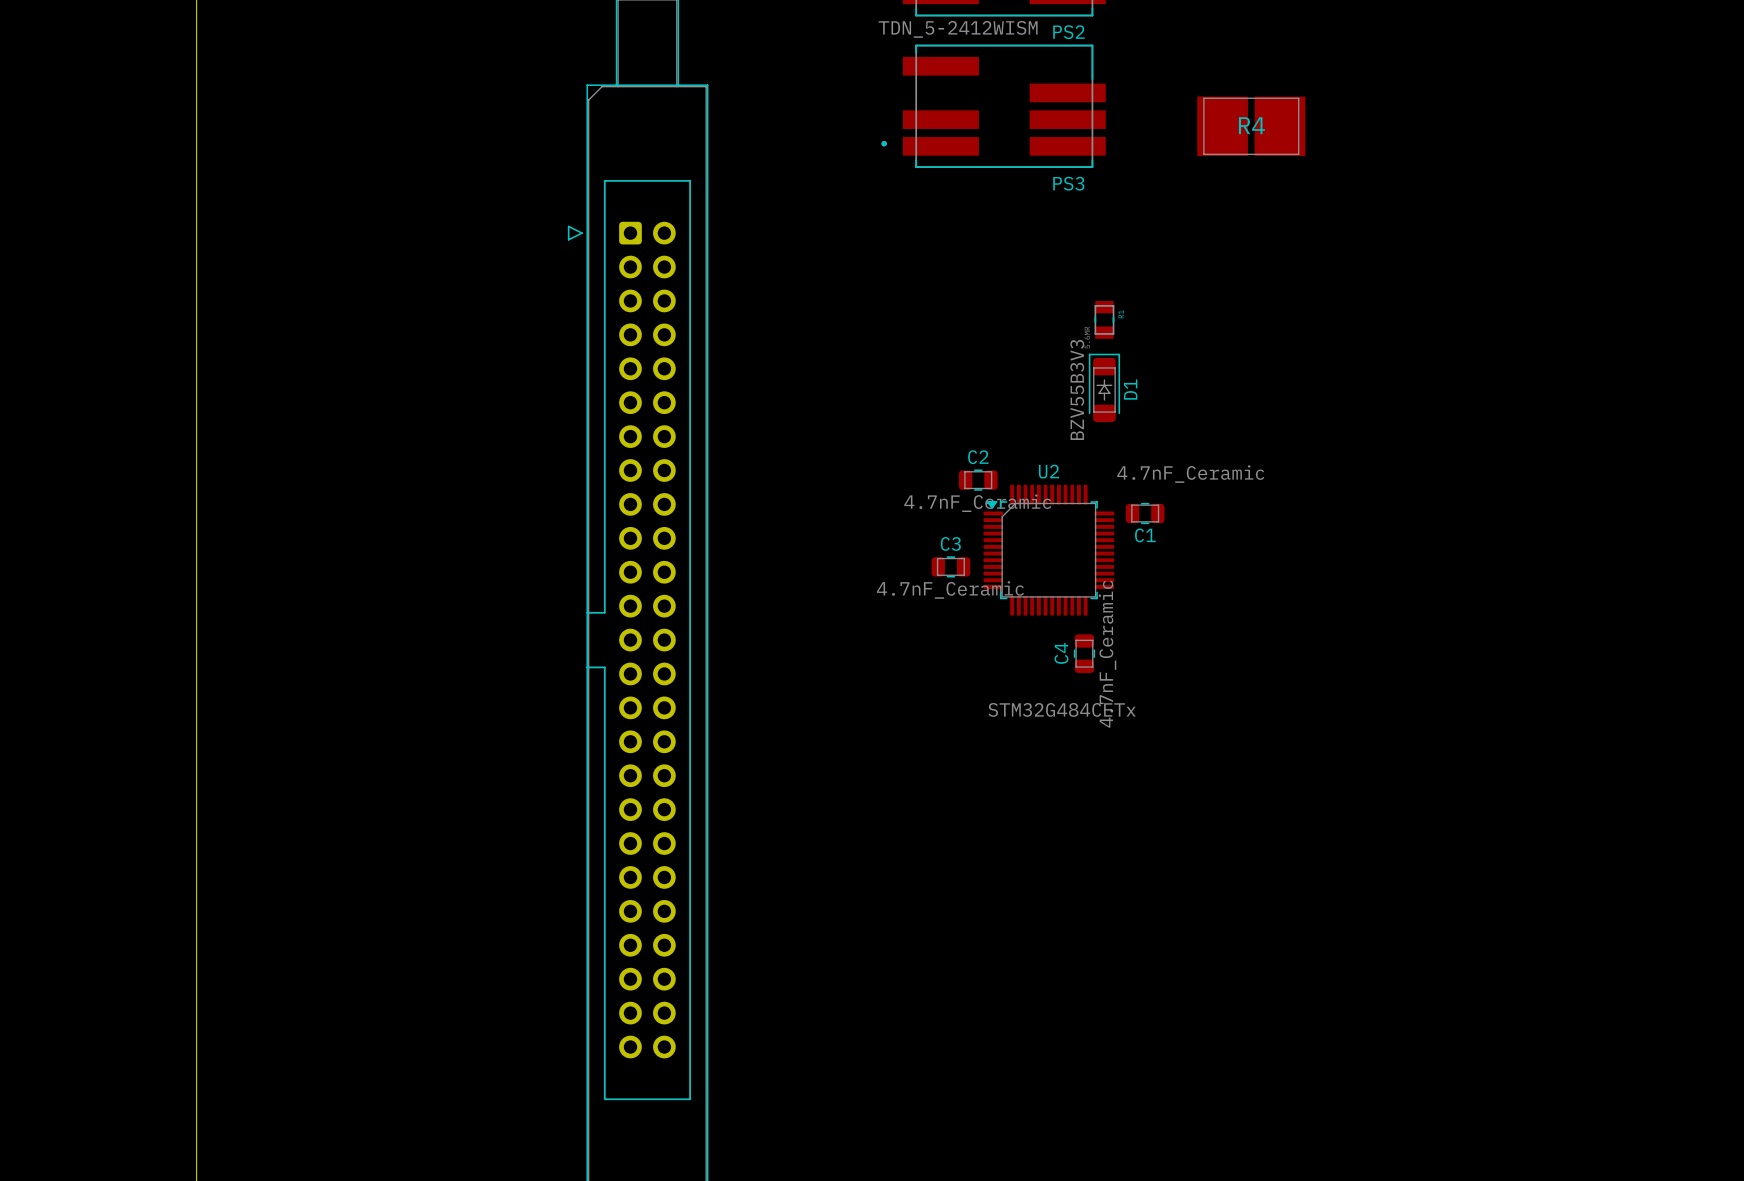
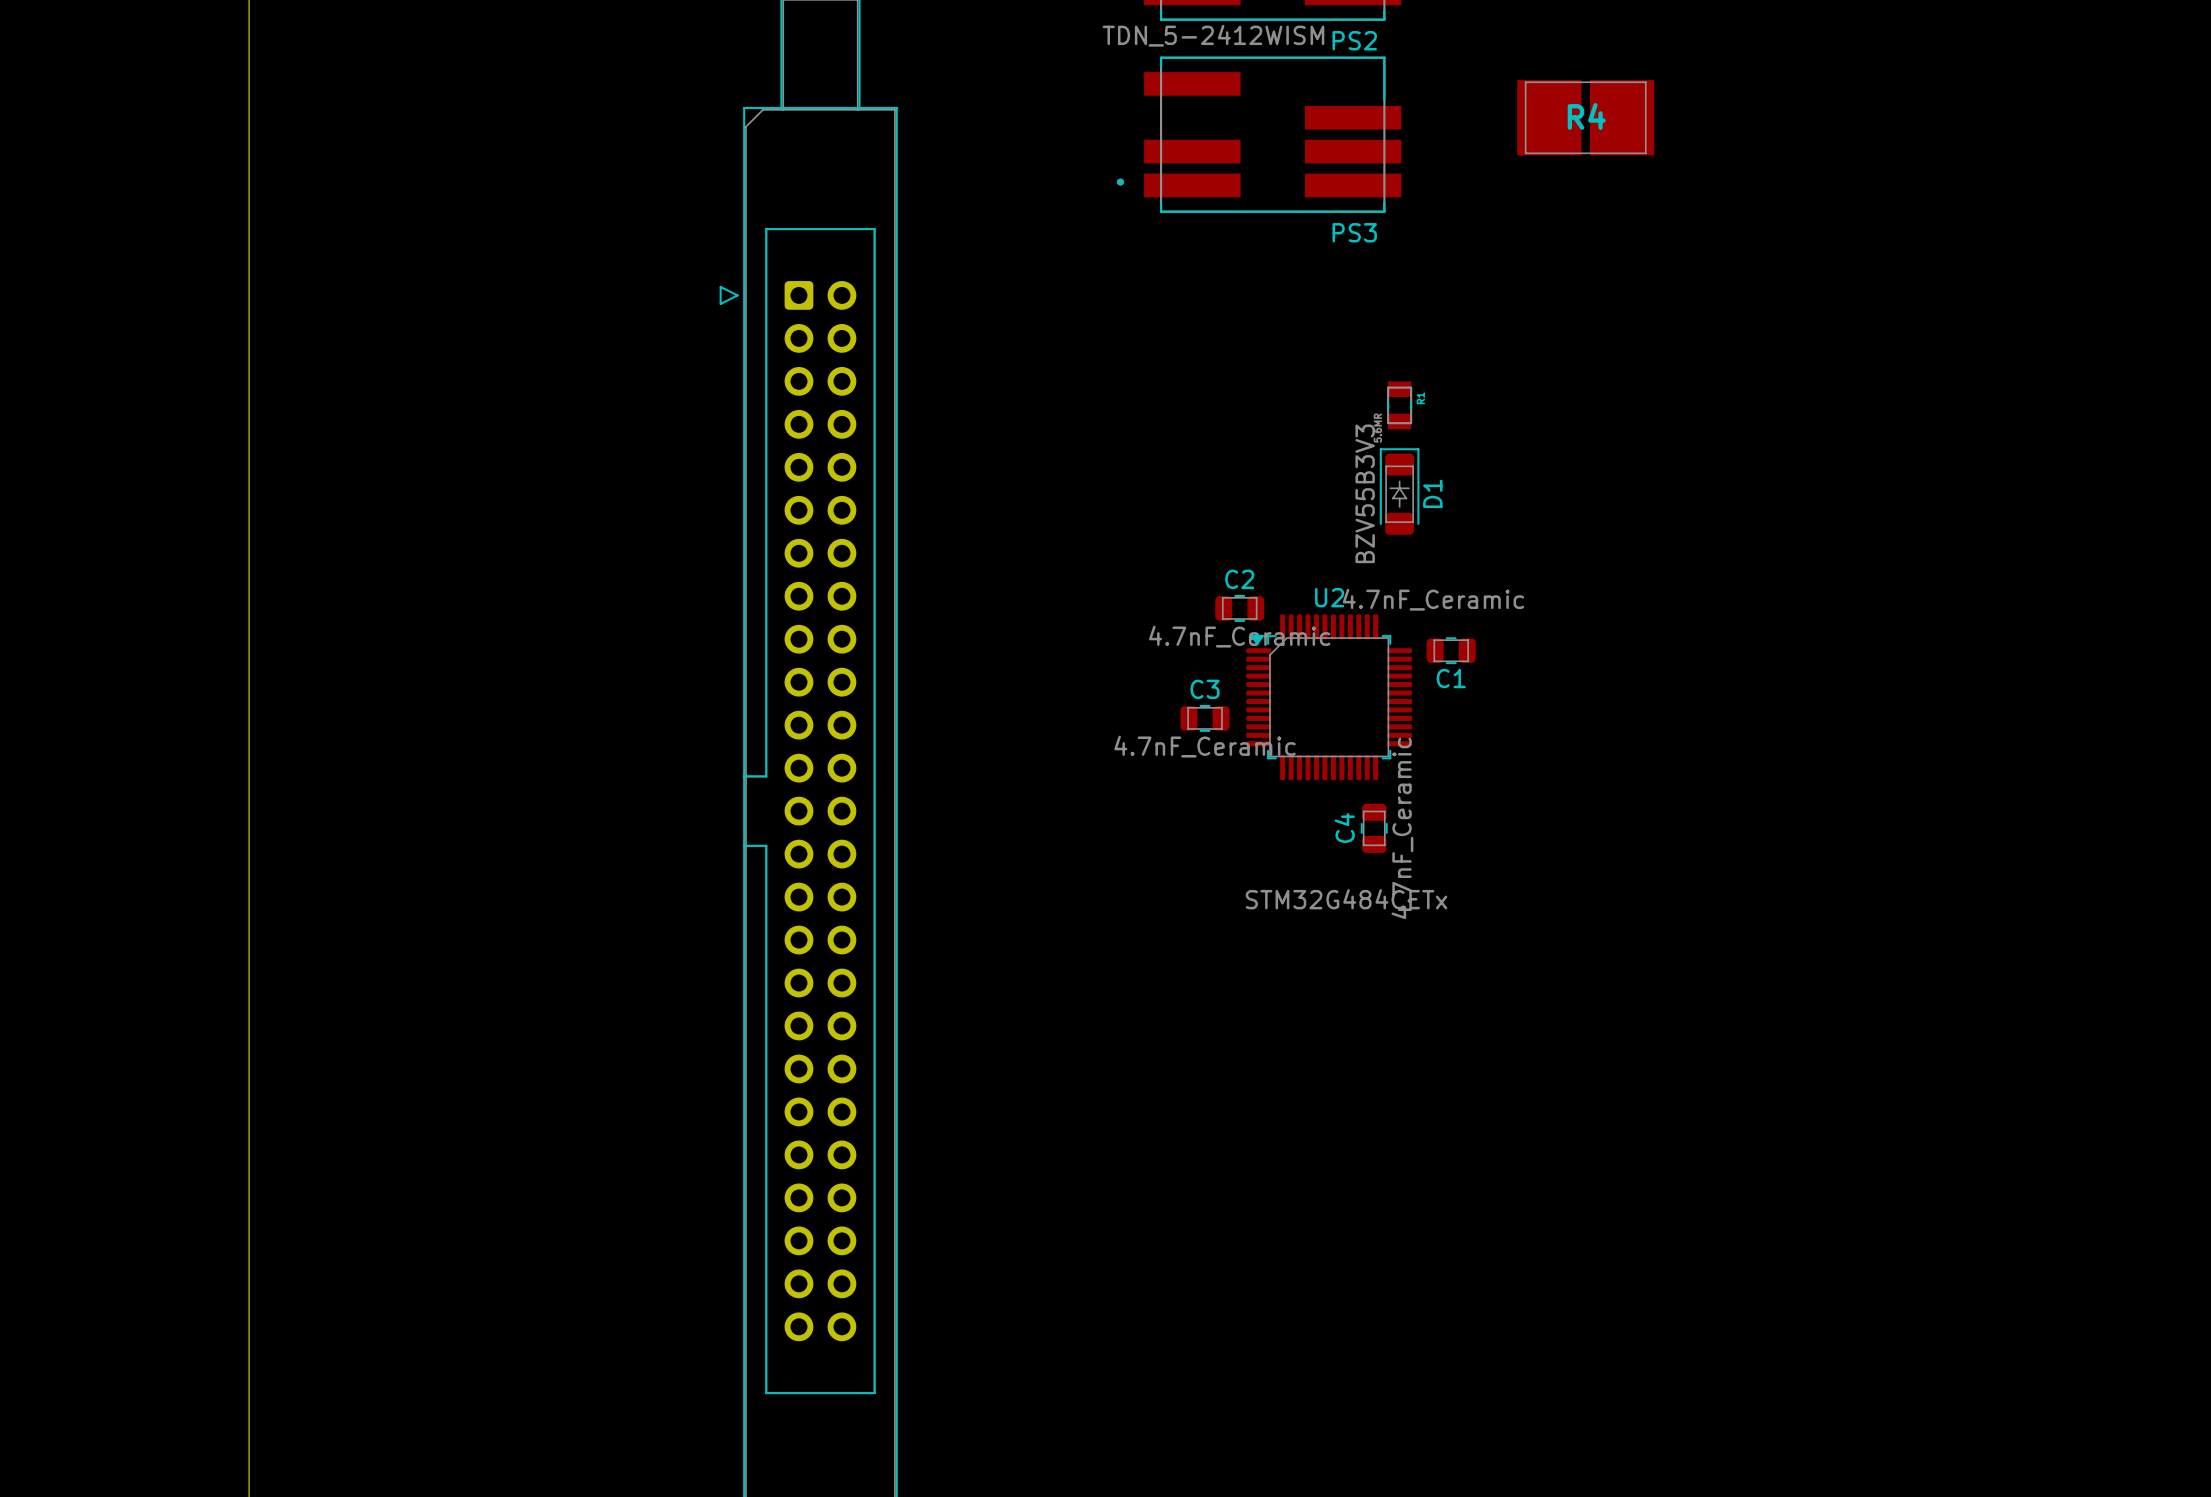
R4 position: (1251, 126) -> (1585, 117)
C1 value position: 4.7nF_Ceramic (1190, 474) -> 4.7nF_Ceramic (1433, 599)

